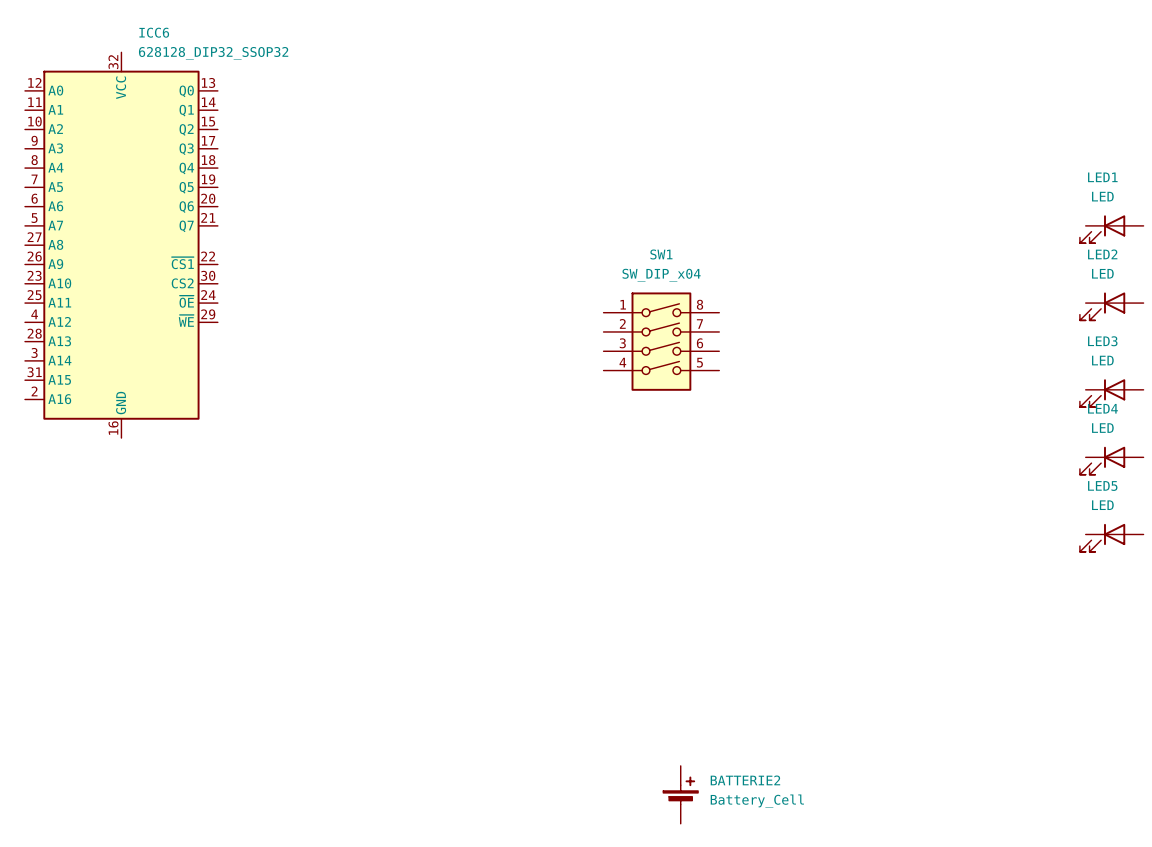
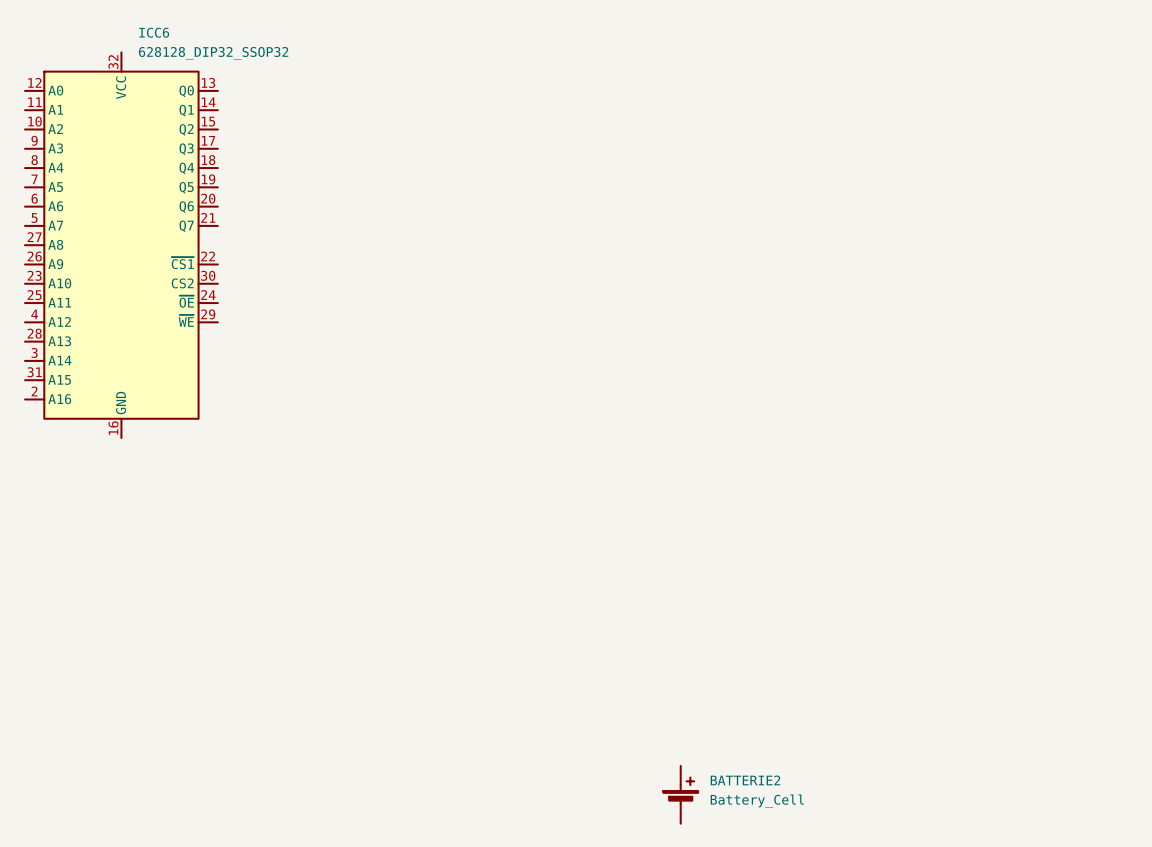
LED1: LED (1111, 229) -> none
LED2: LED (1111, 306) -> none
SW1: SW_DIP_x04 (661, 341) -> none
LED3: LED (1111, 393) -> none
LED4: LED (1111, 460) -> none
LED5: LED (1111, 537) -> none

